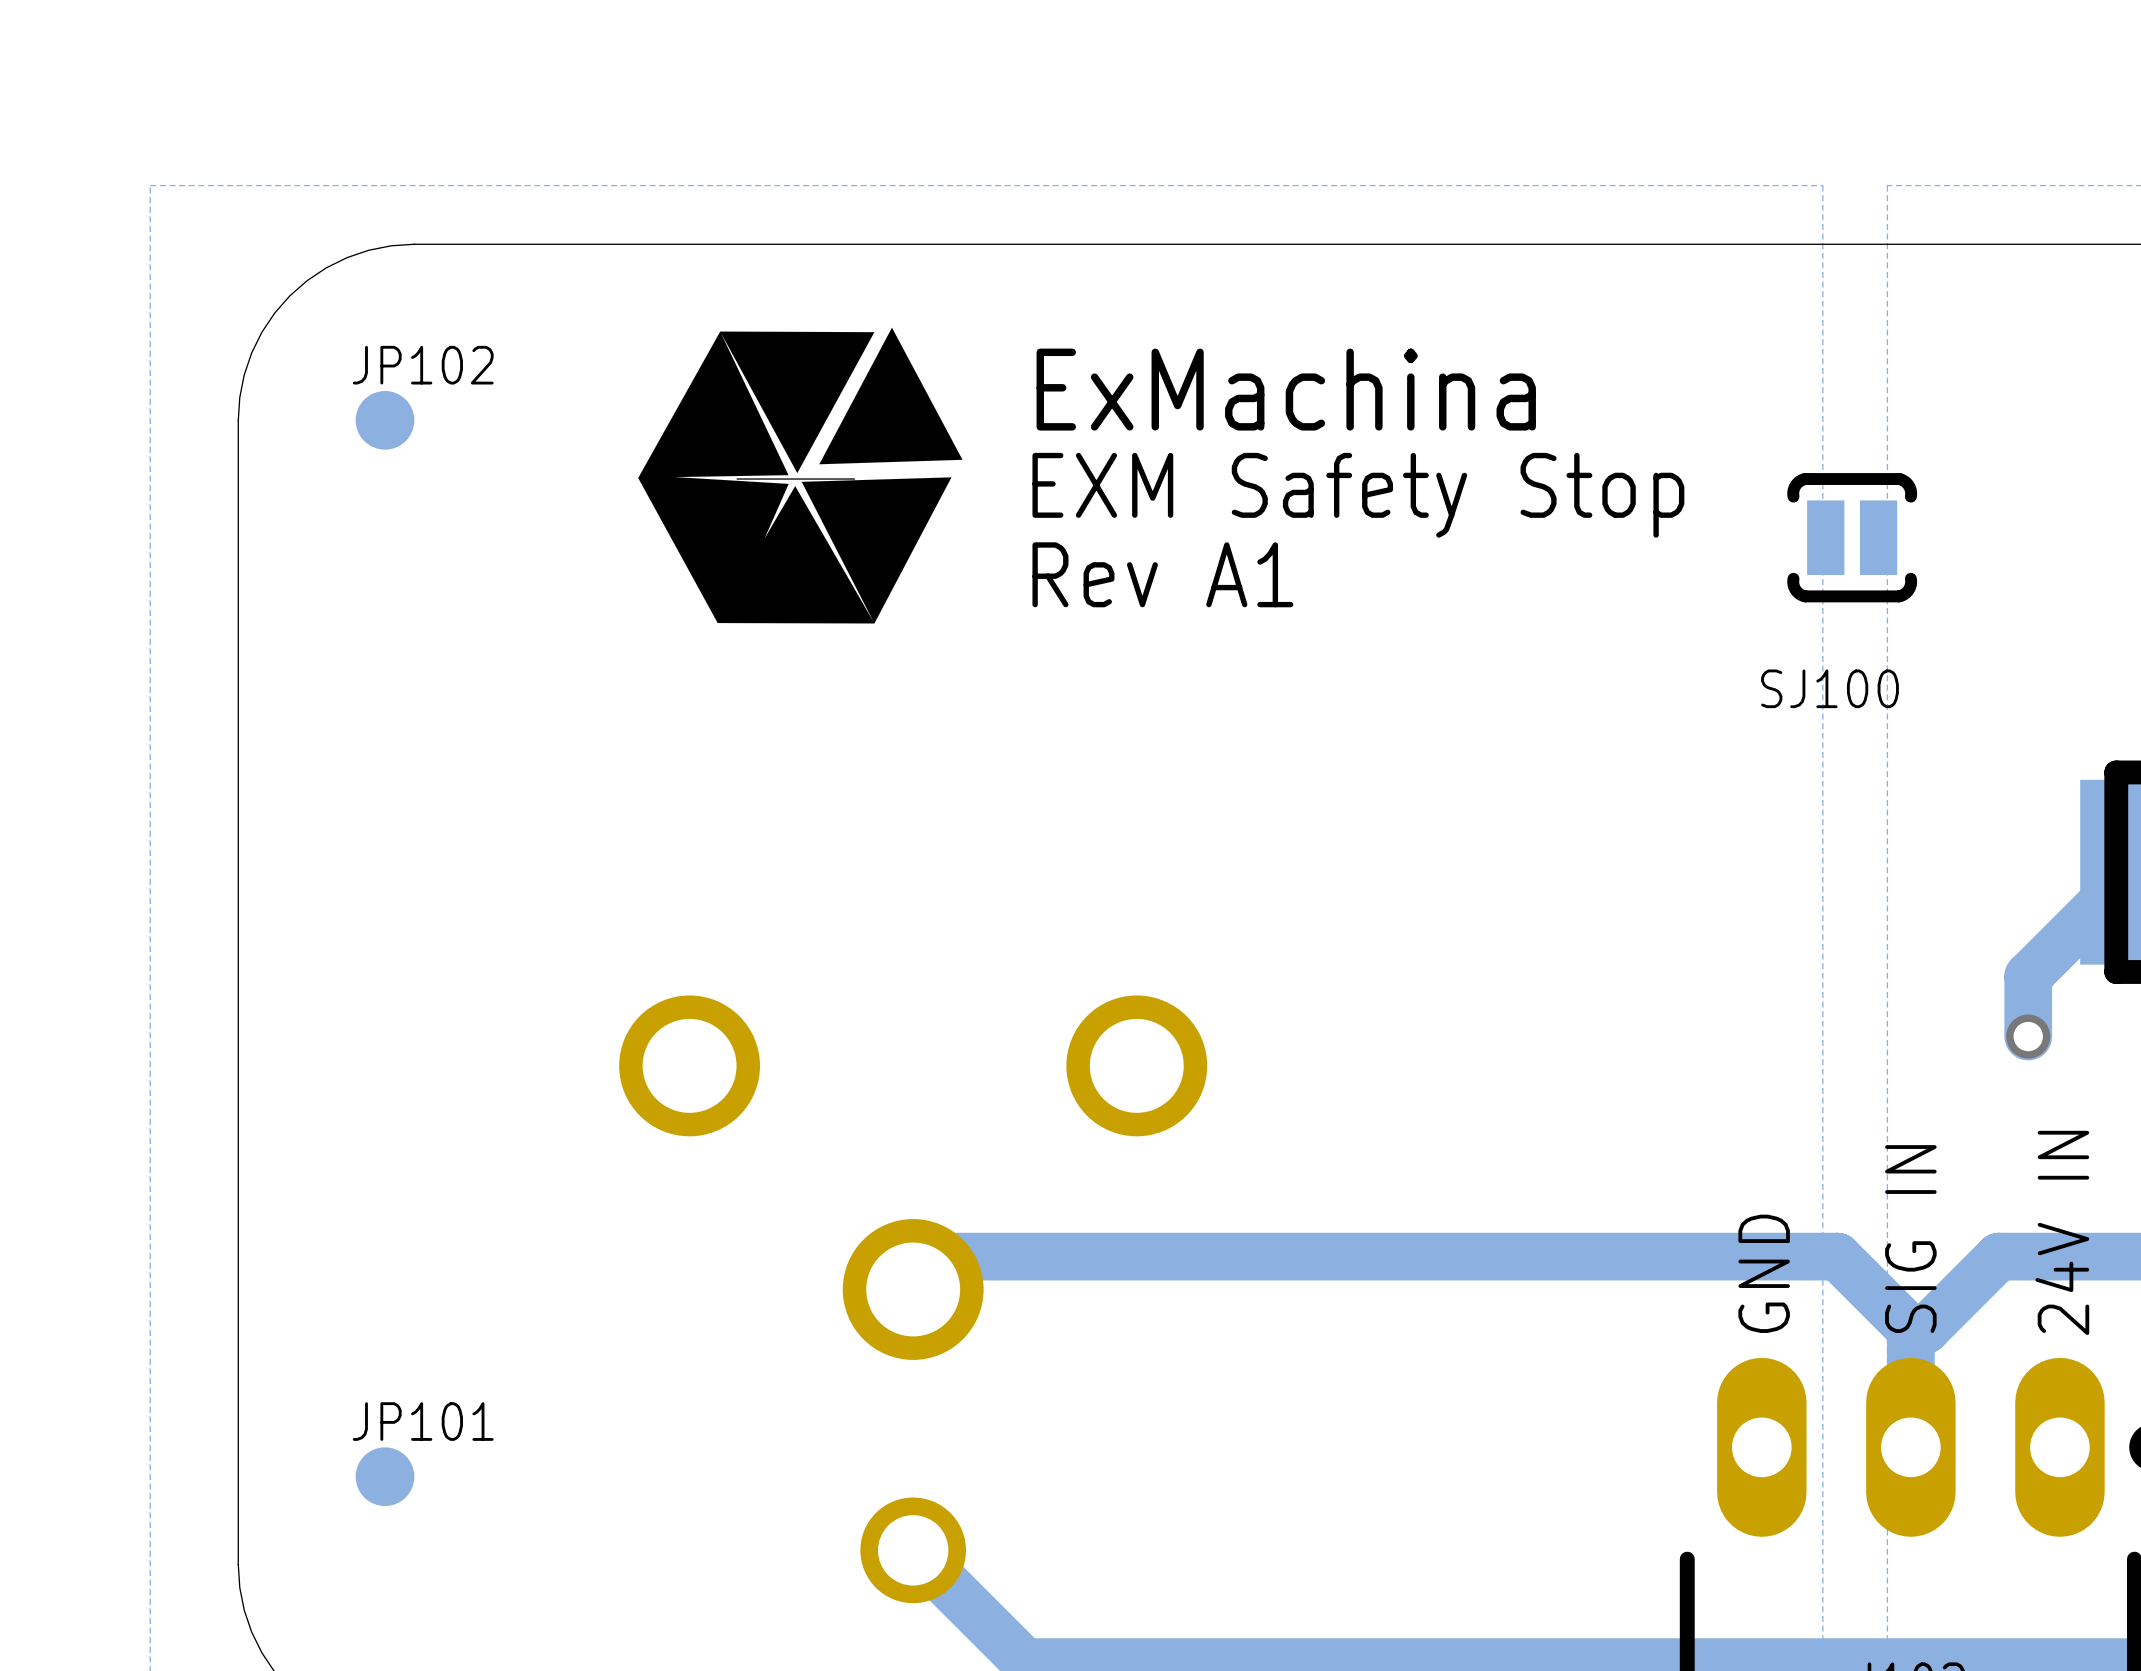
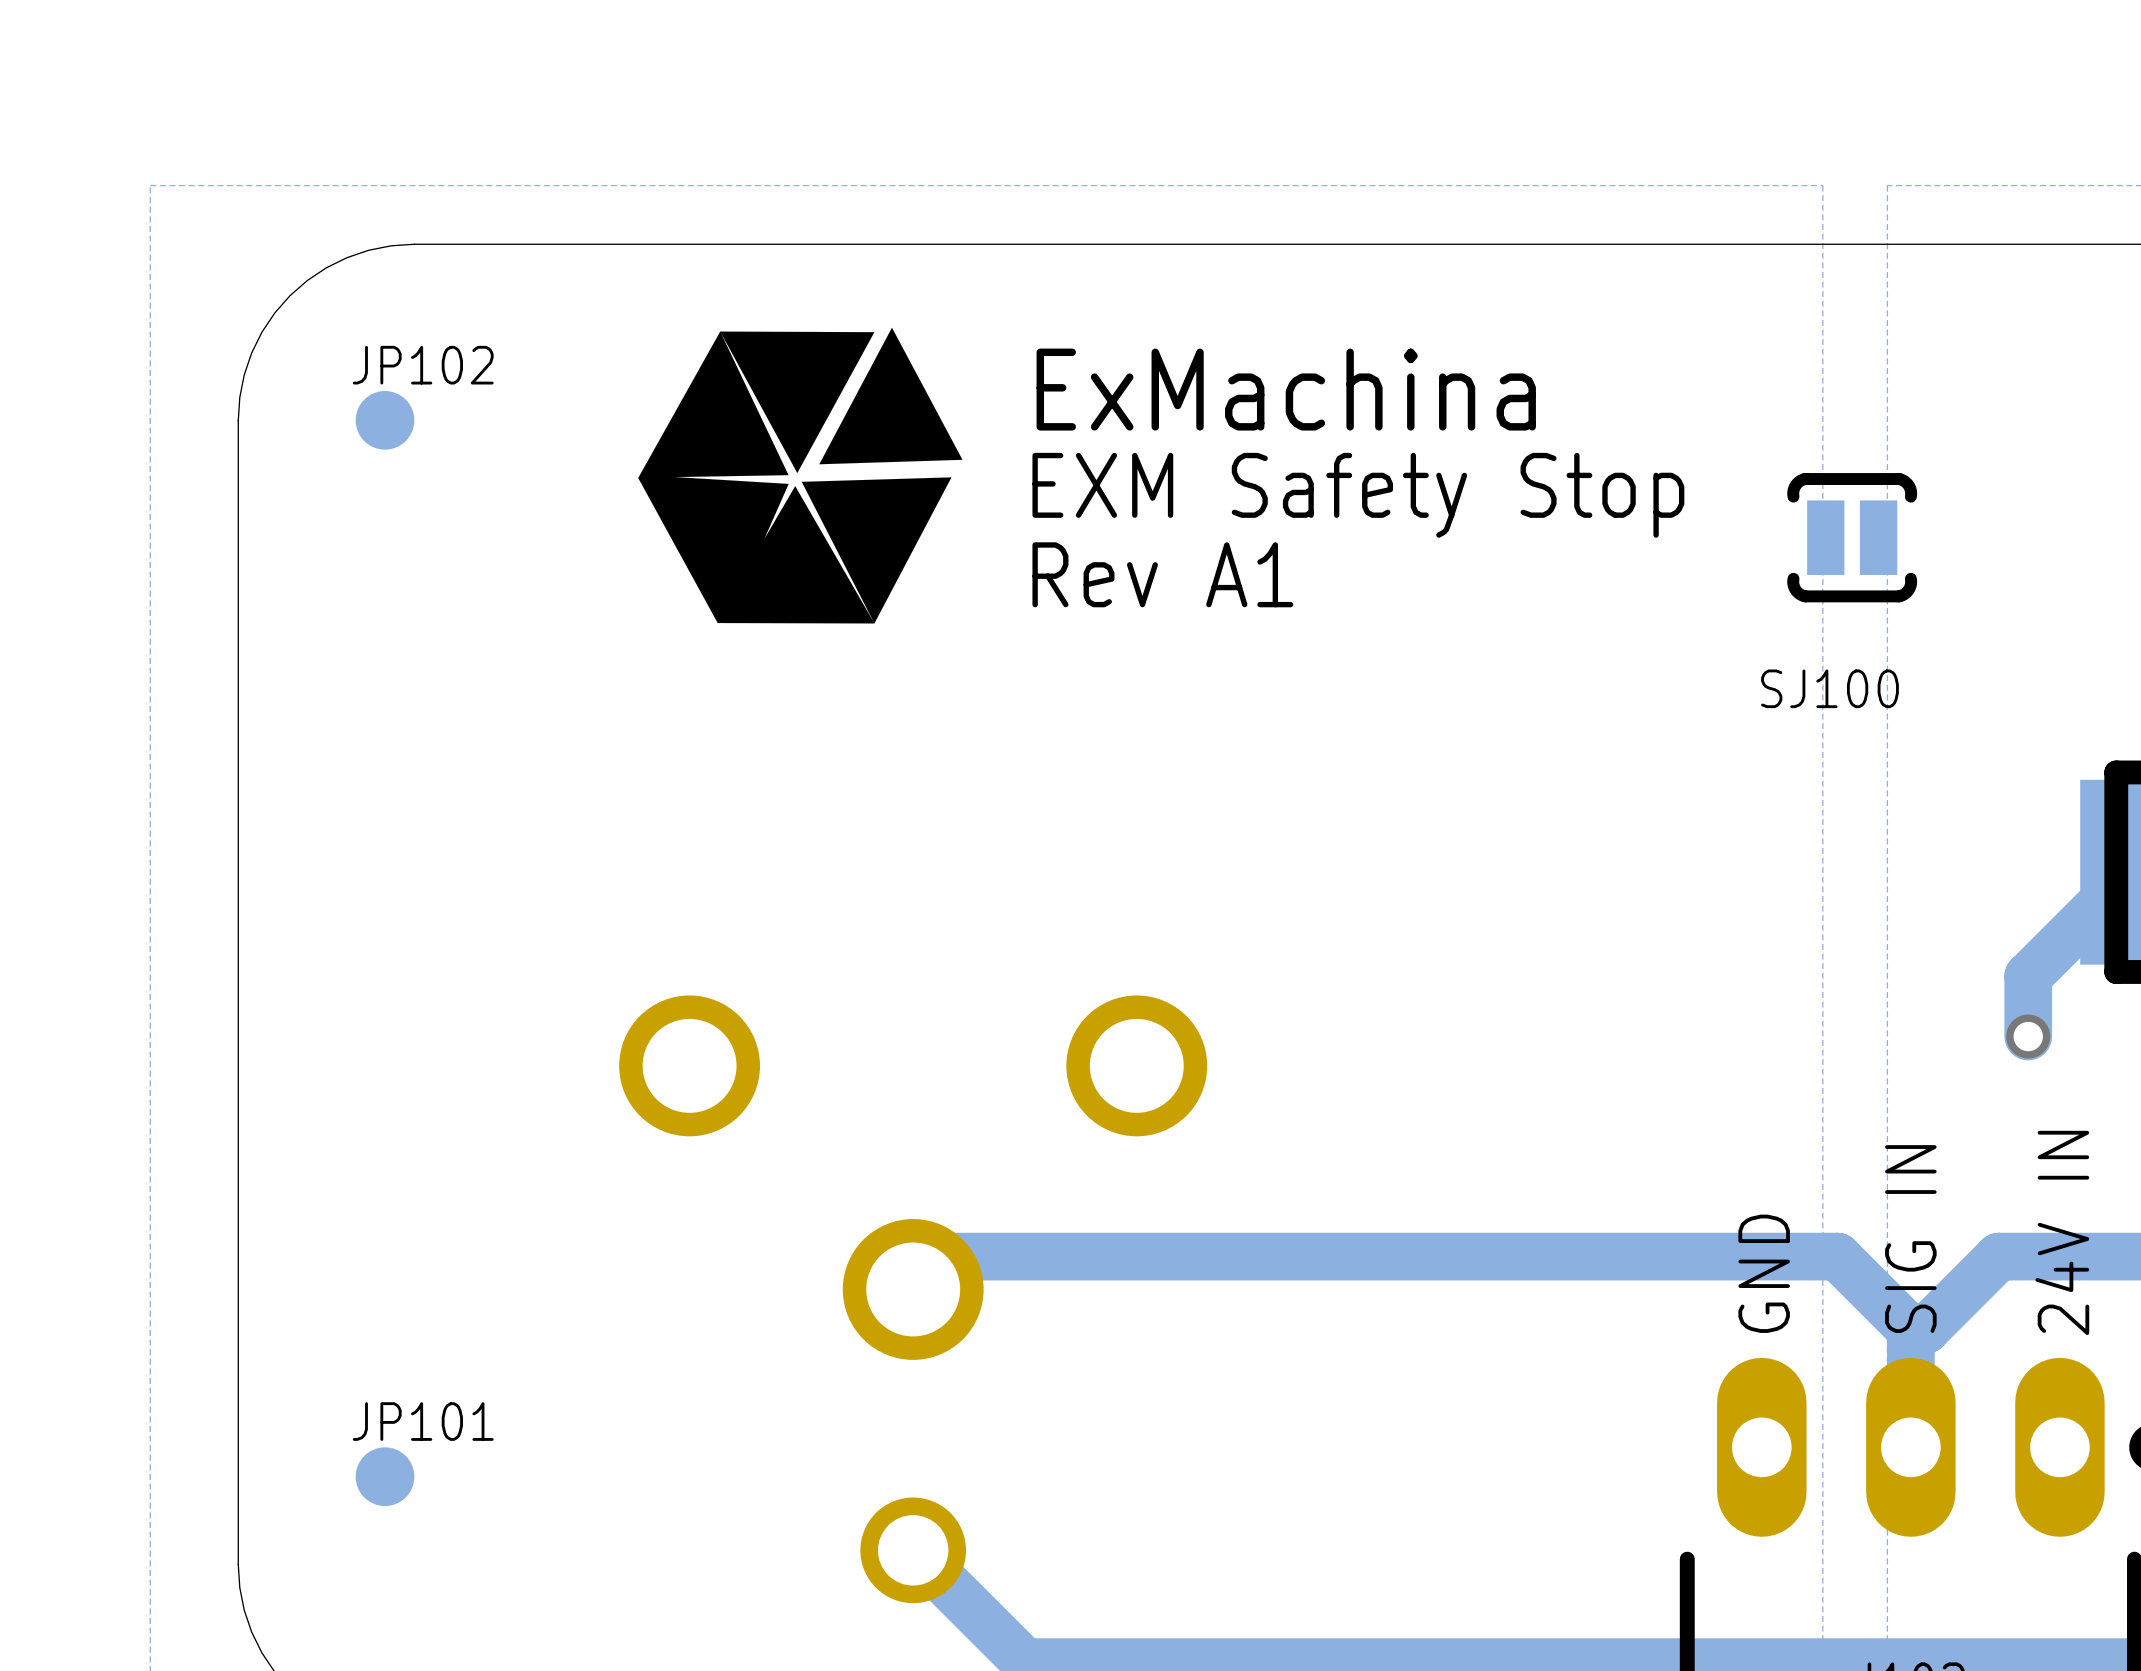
drawing shape: [638, 327, 1536, 624] -> [638, 327, 1536, 624]

